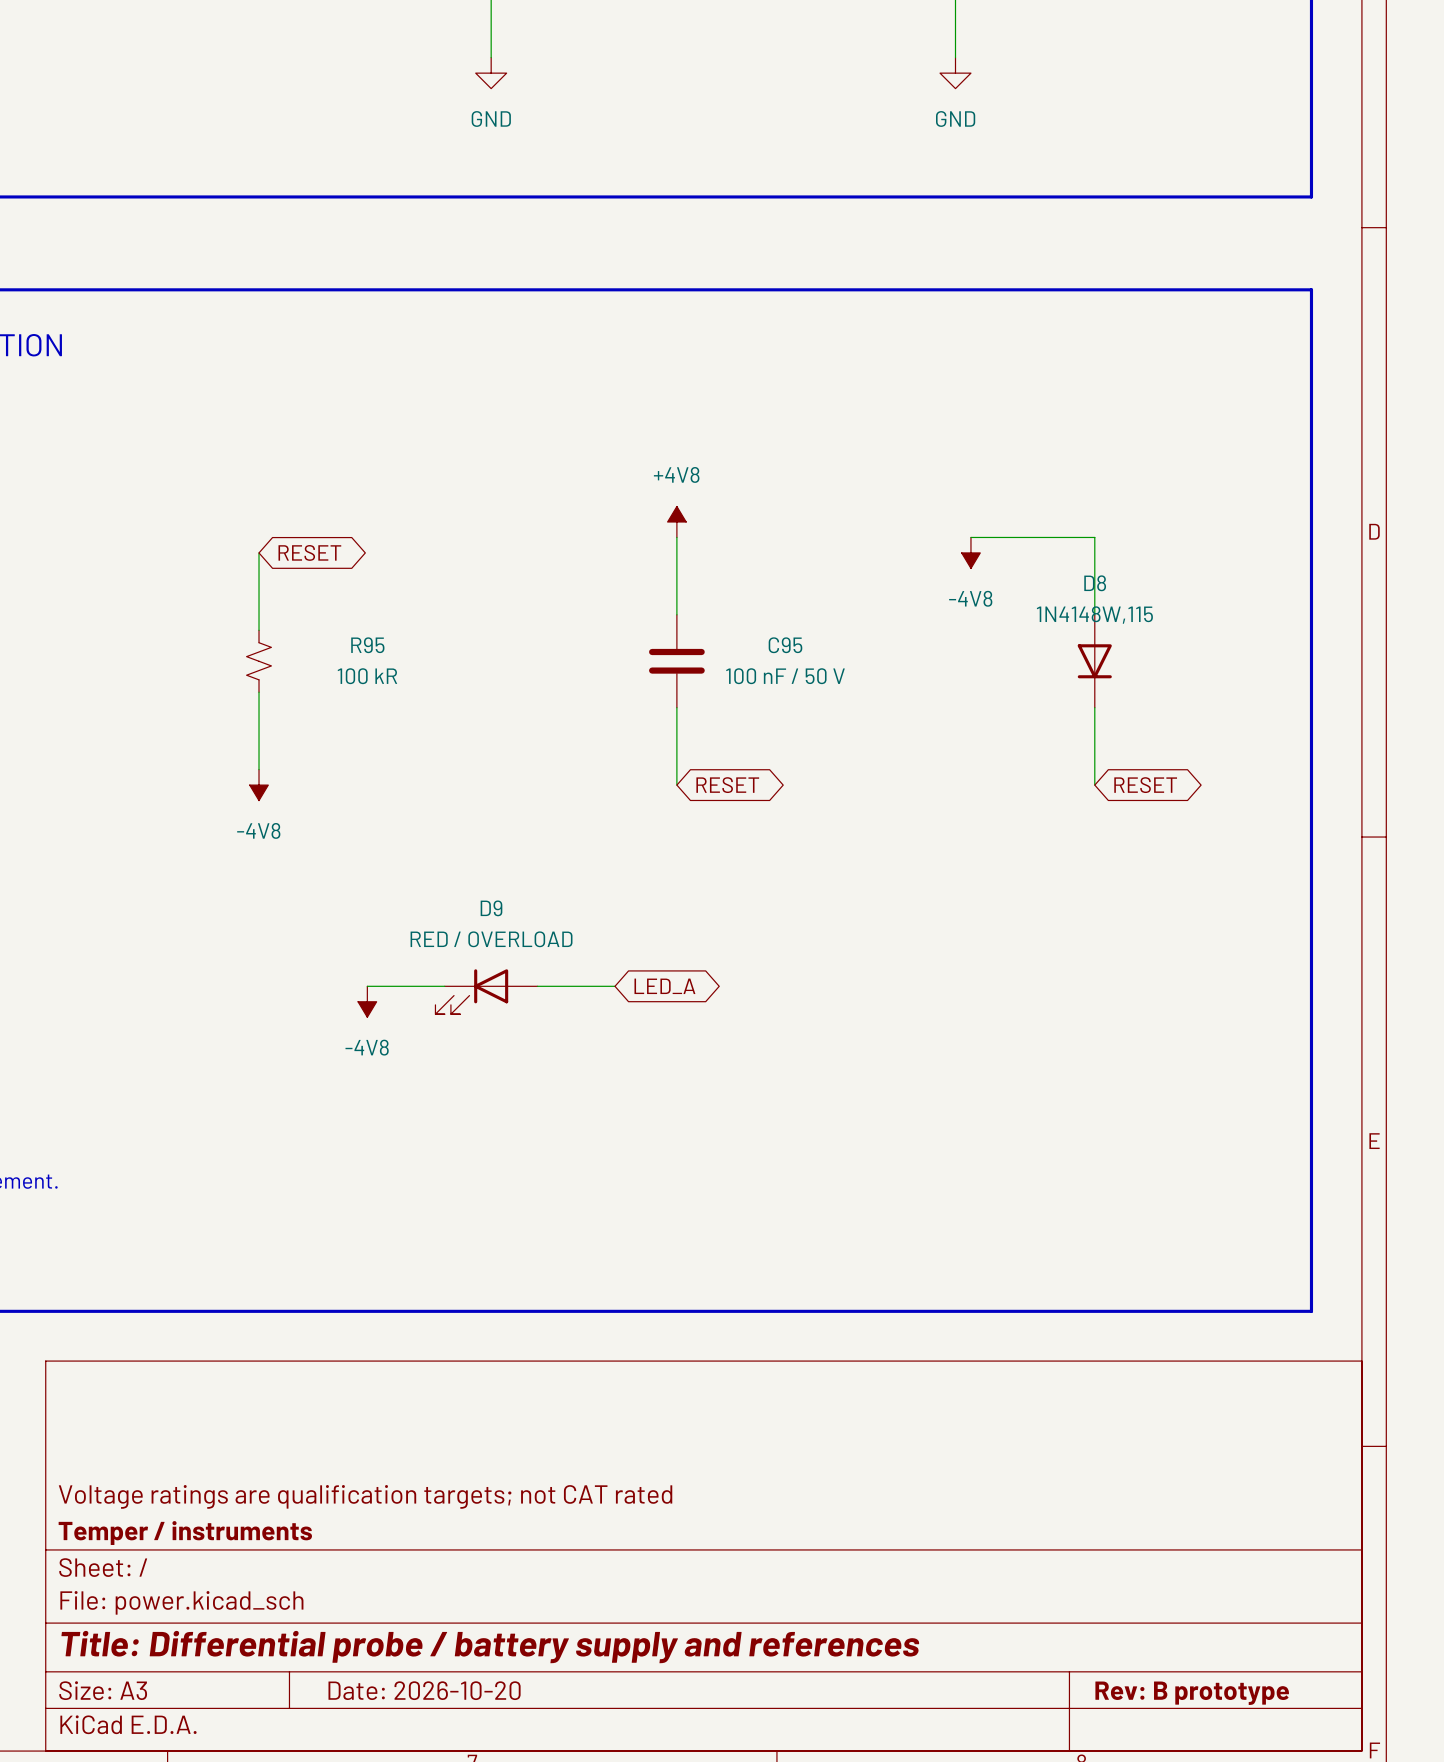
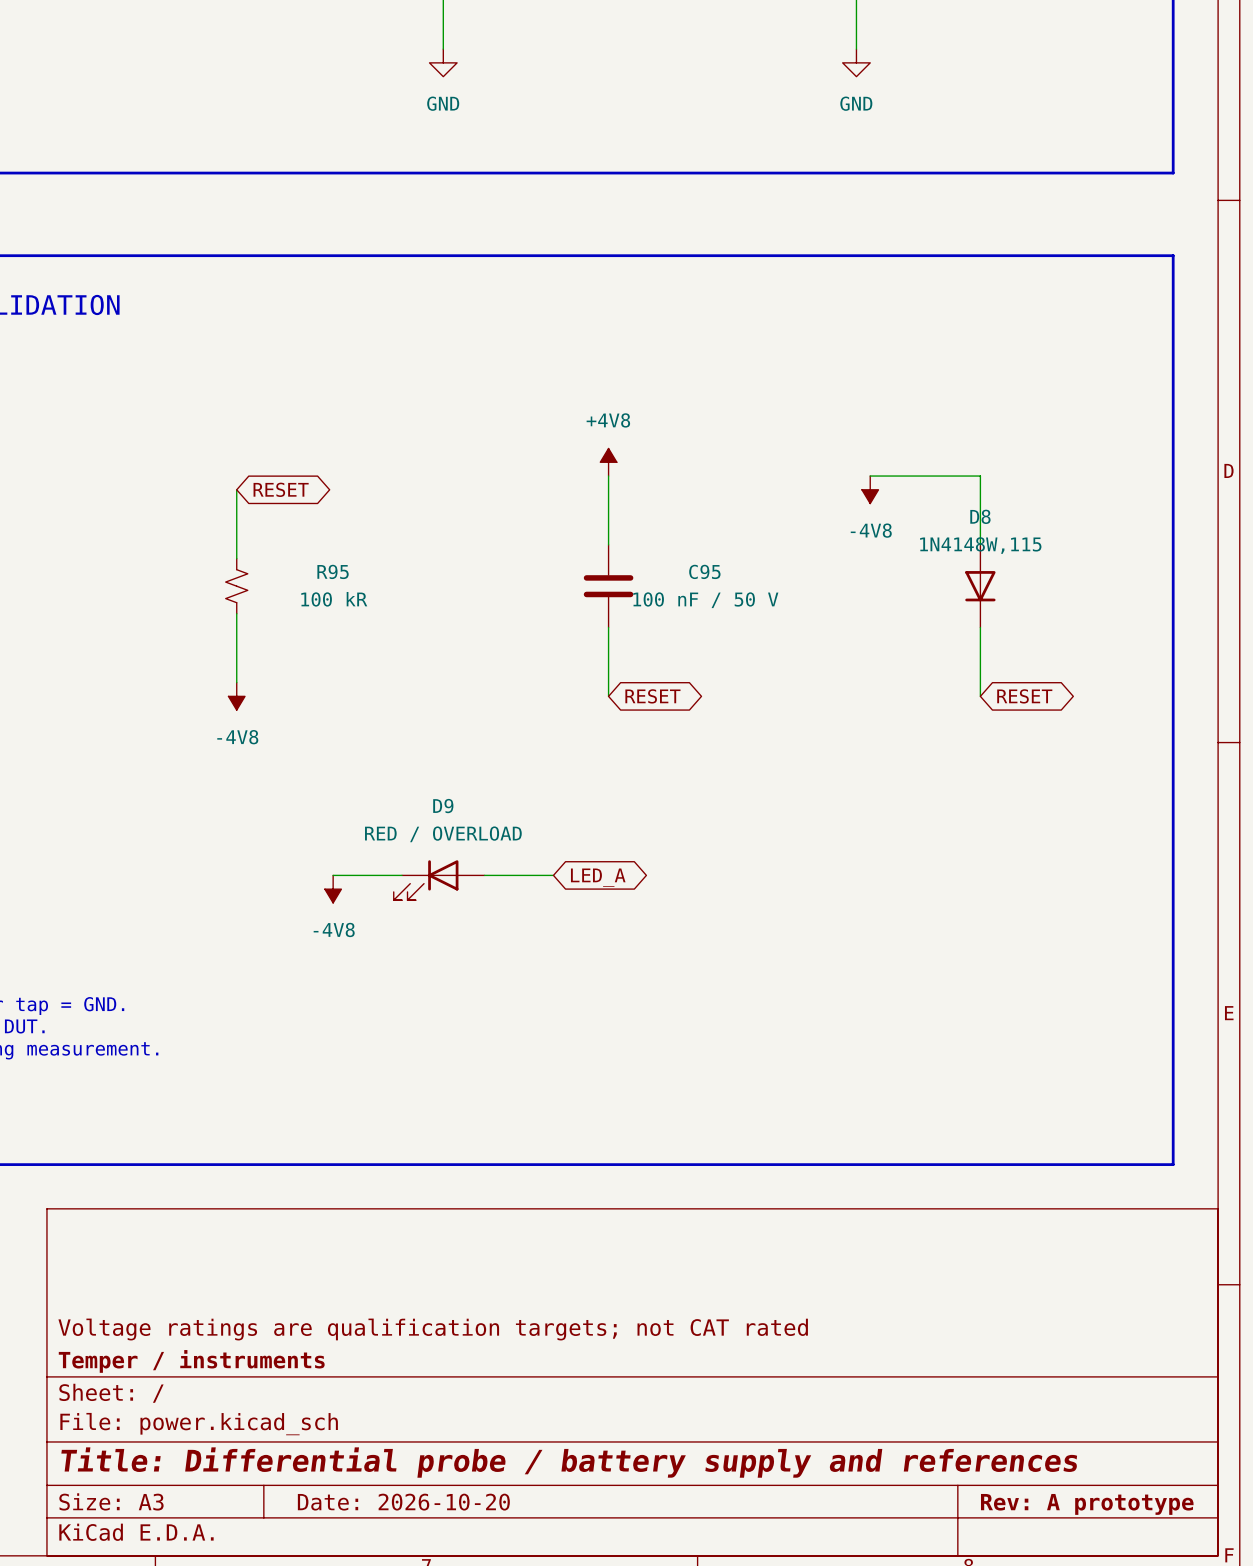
title block: Rev: B prototype (1192, 1693) -> Rev: A prototype (1087, 1504)

